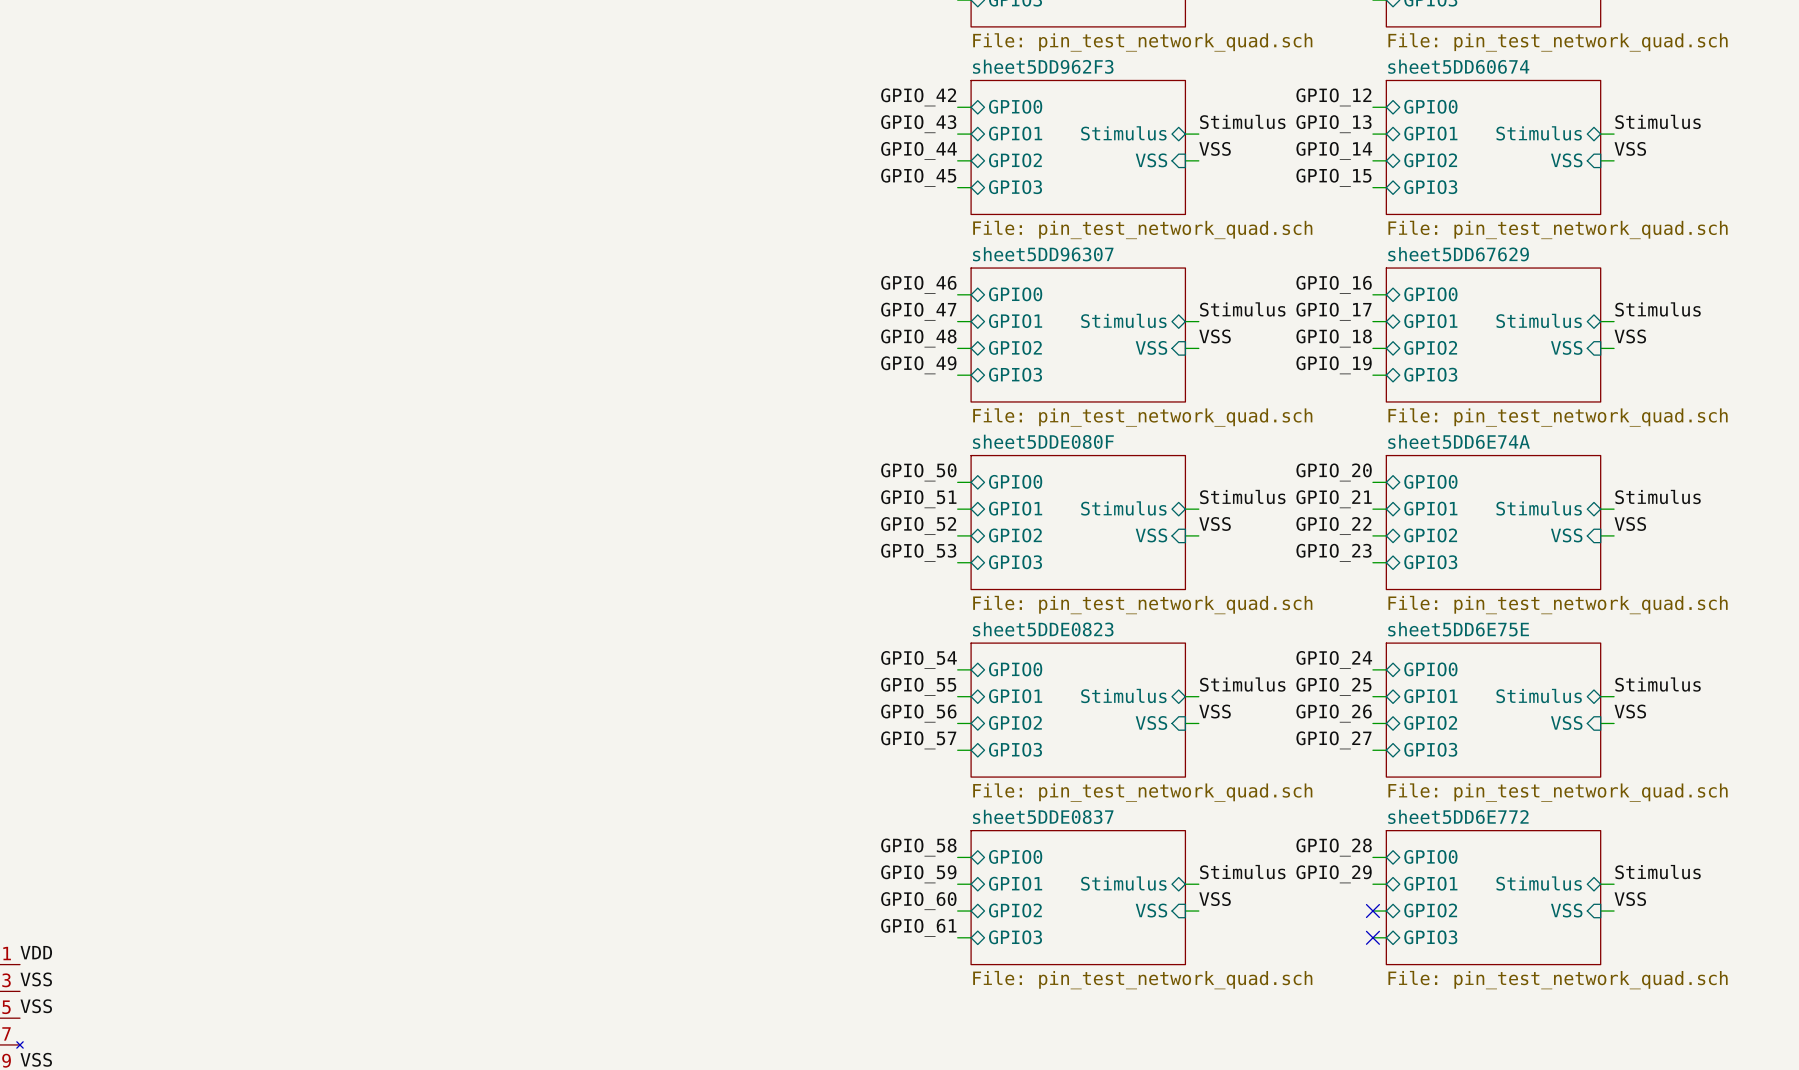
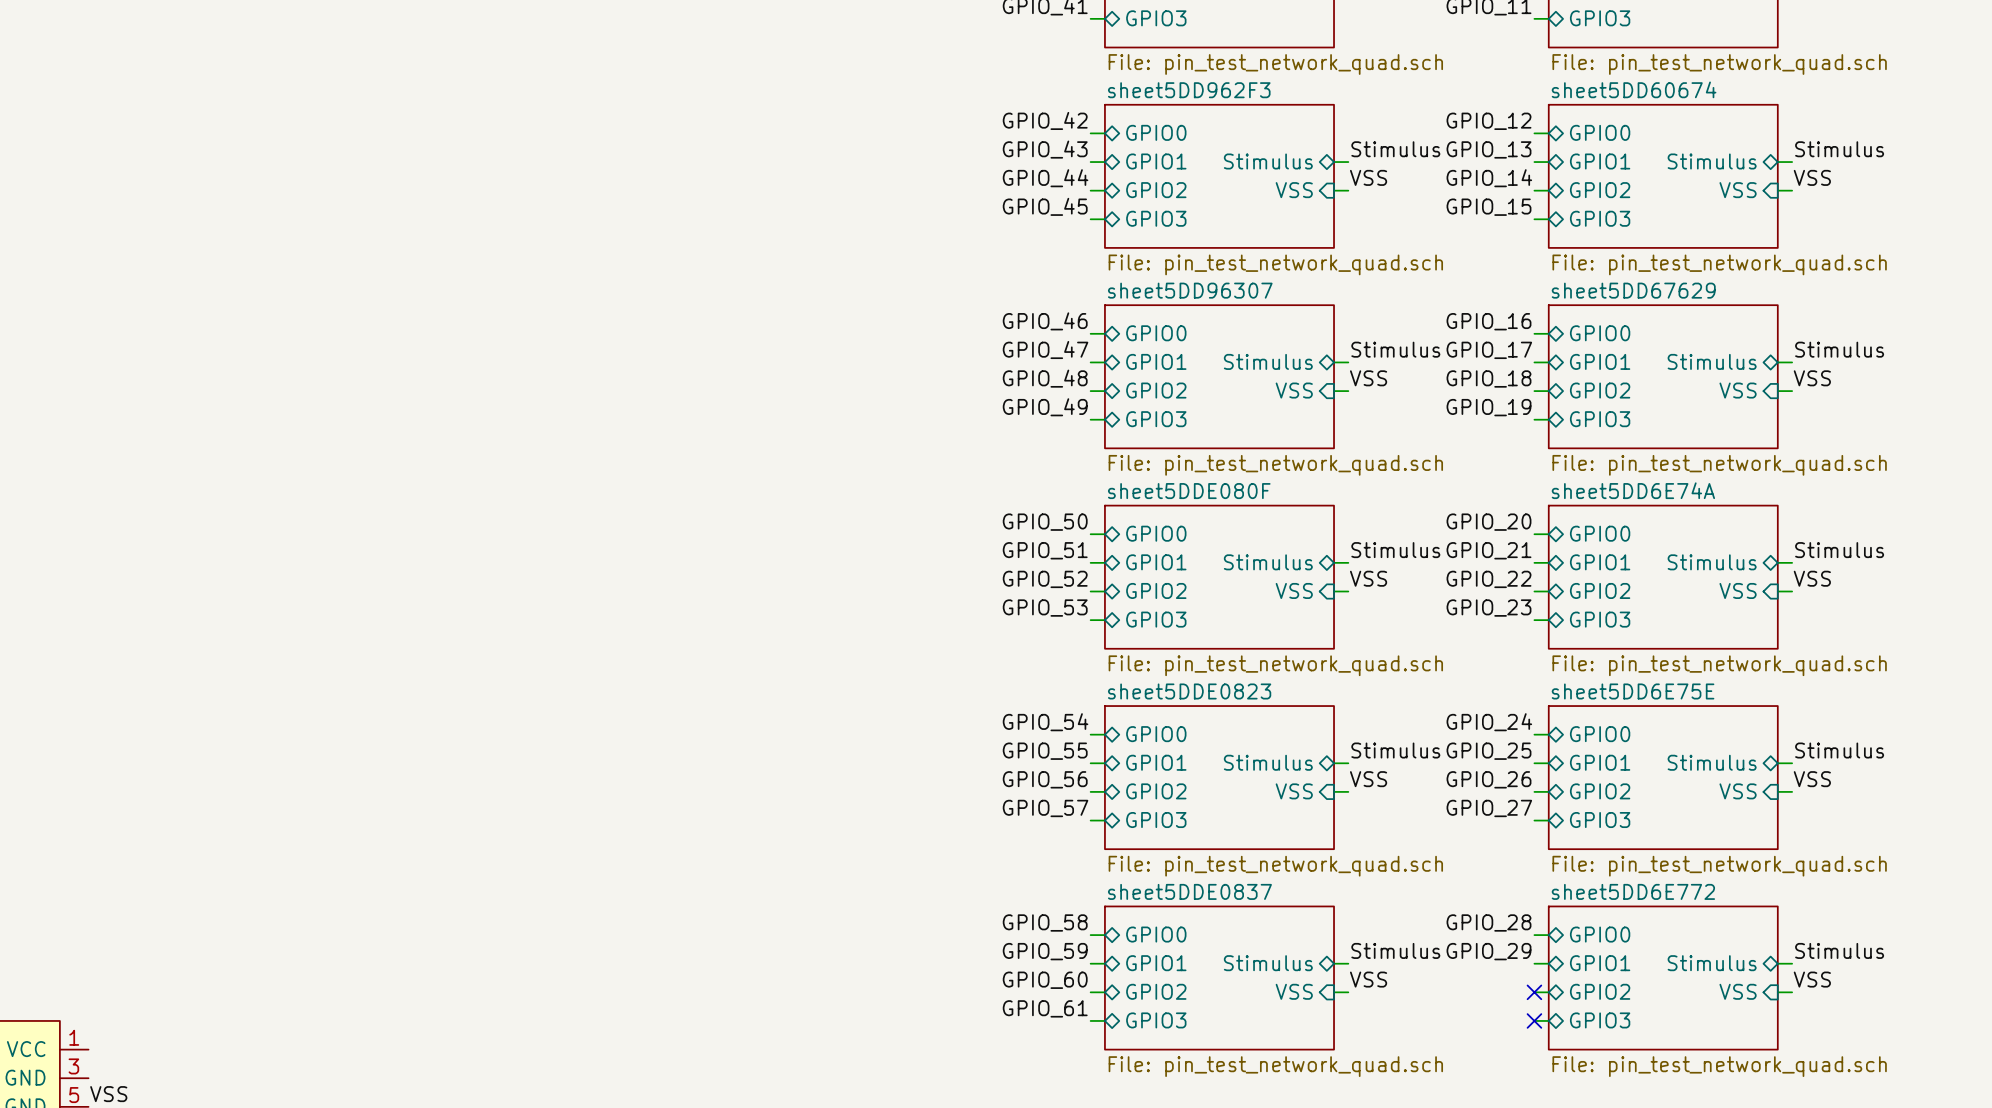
label: VDD (36, 952) -> none
label: VSS (36, 979) -> none

